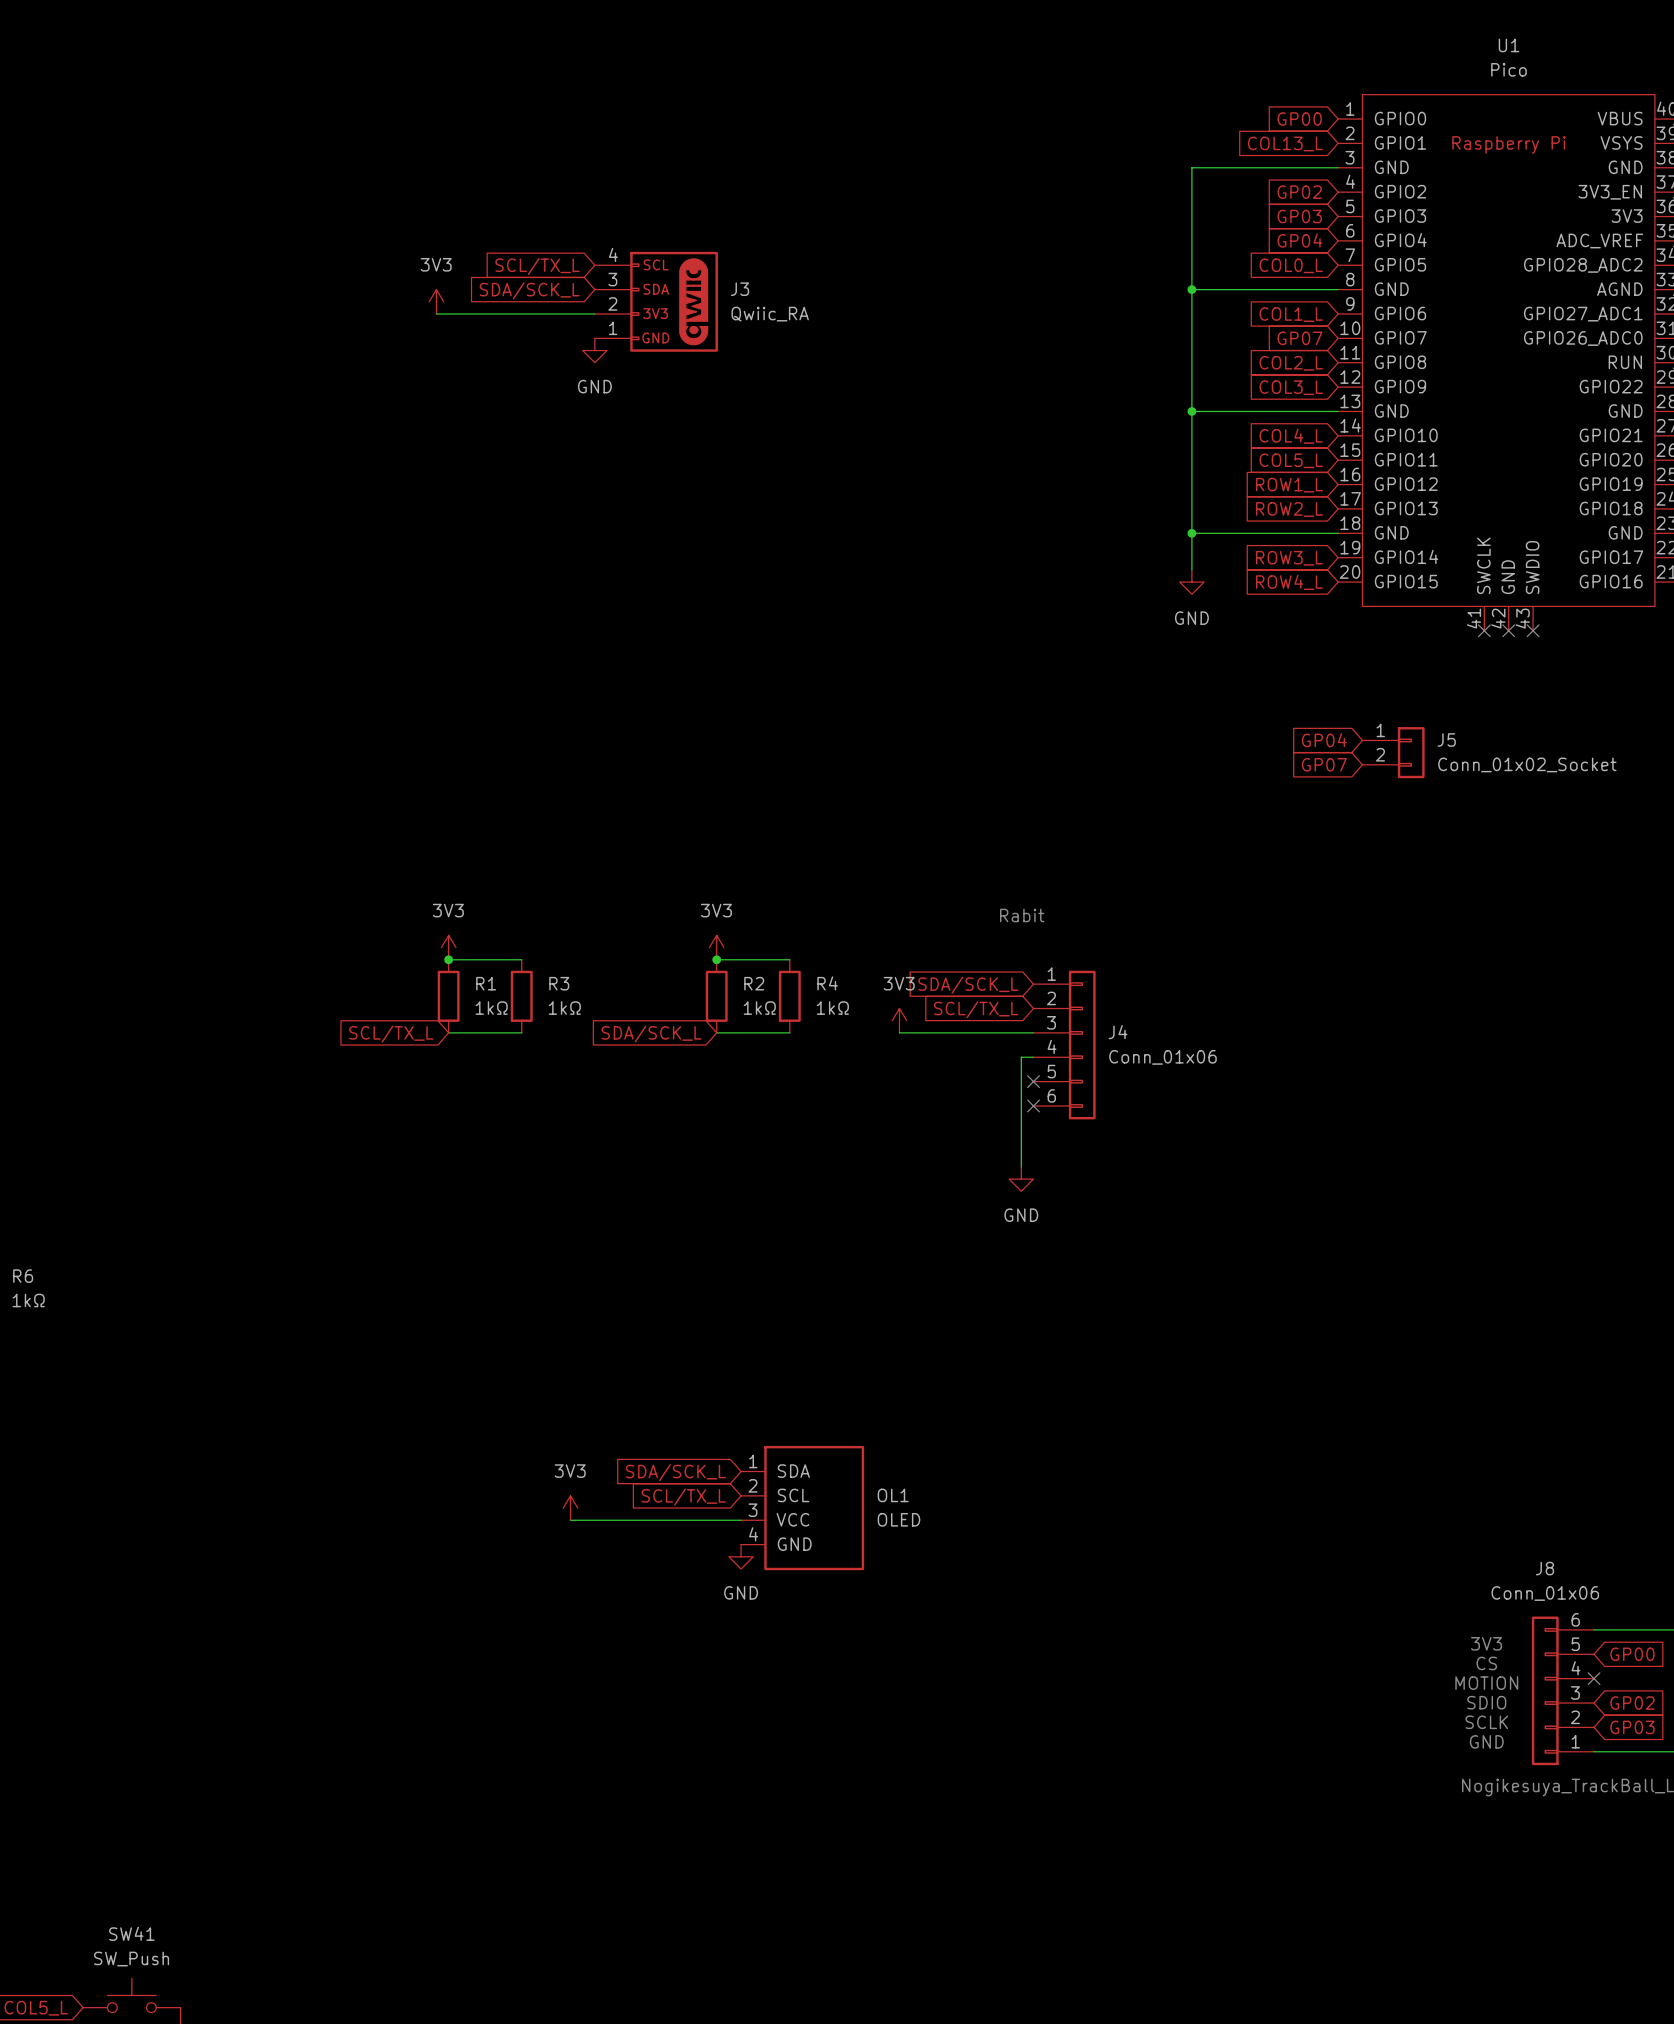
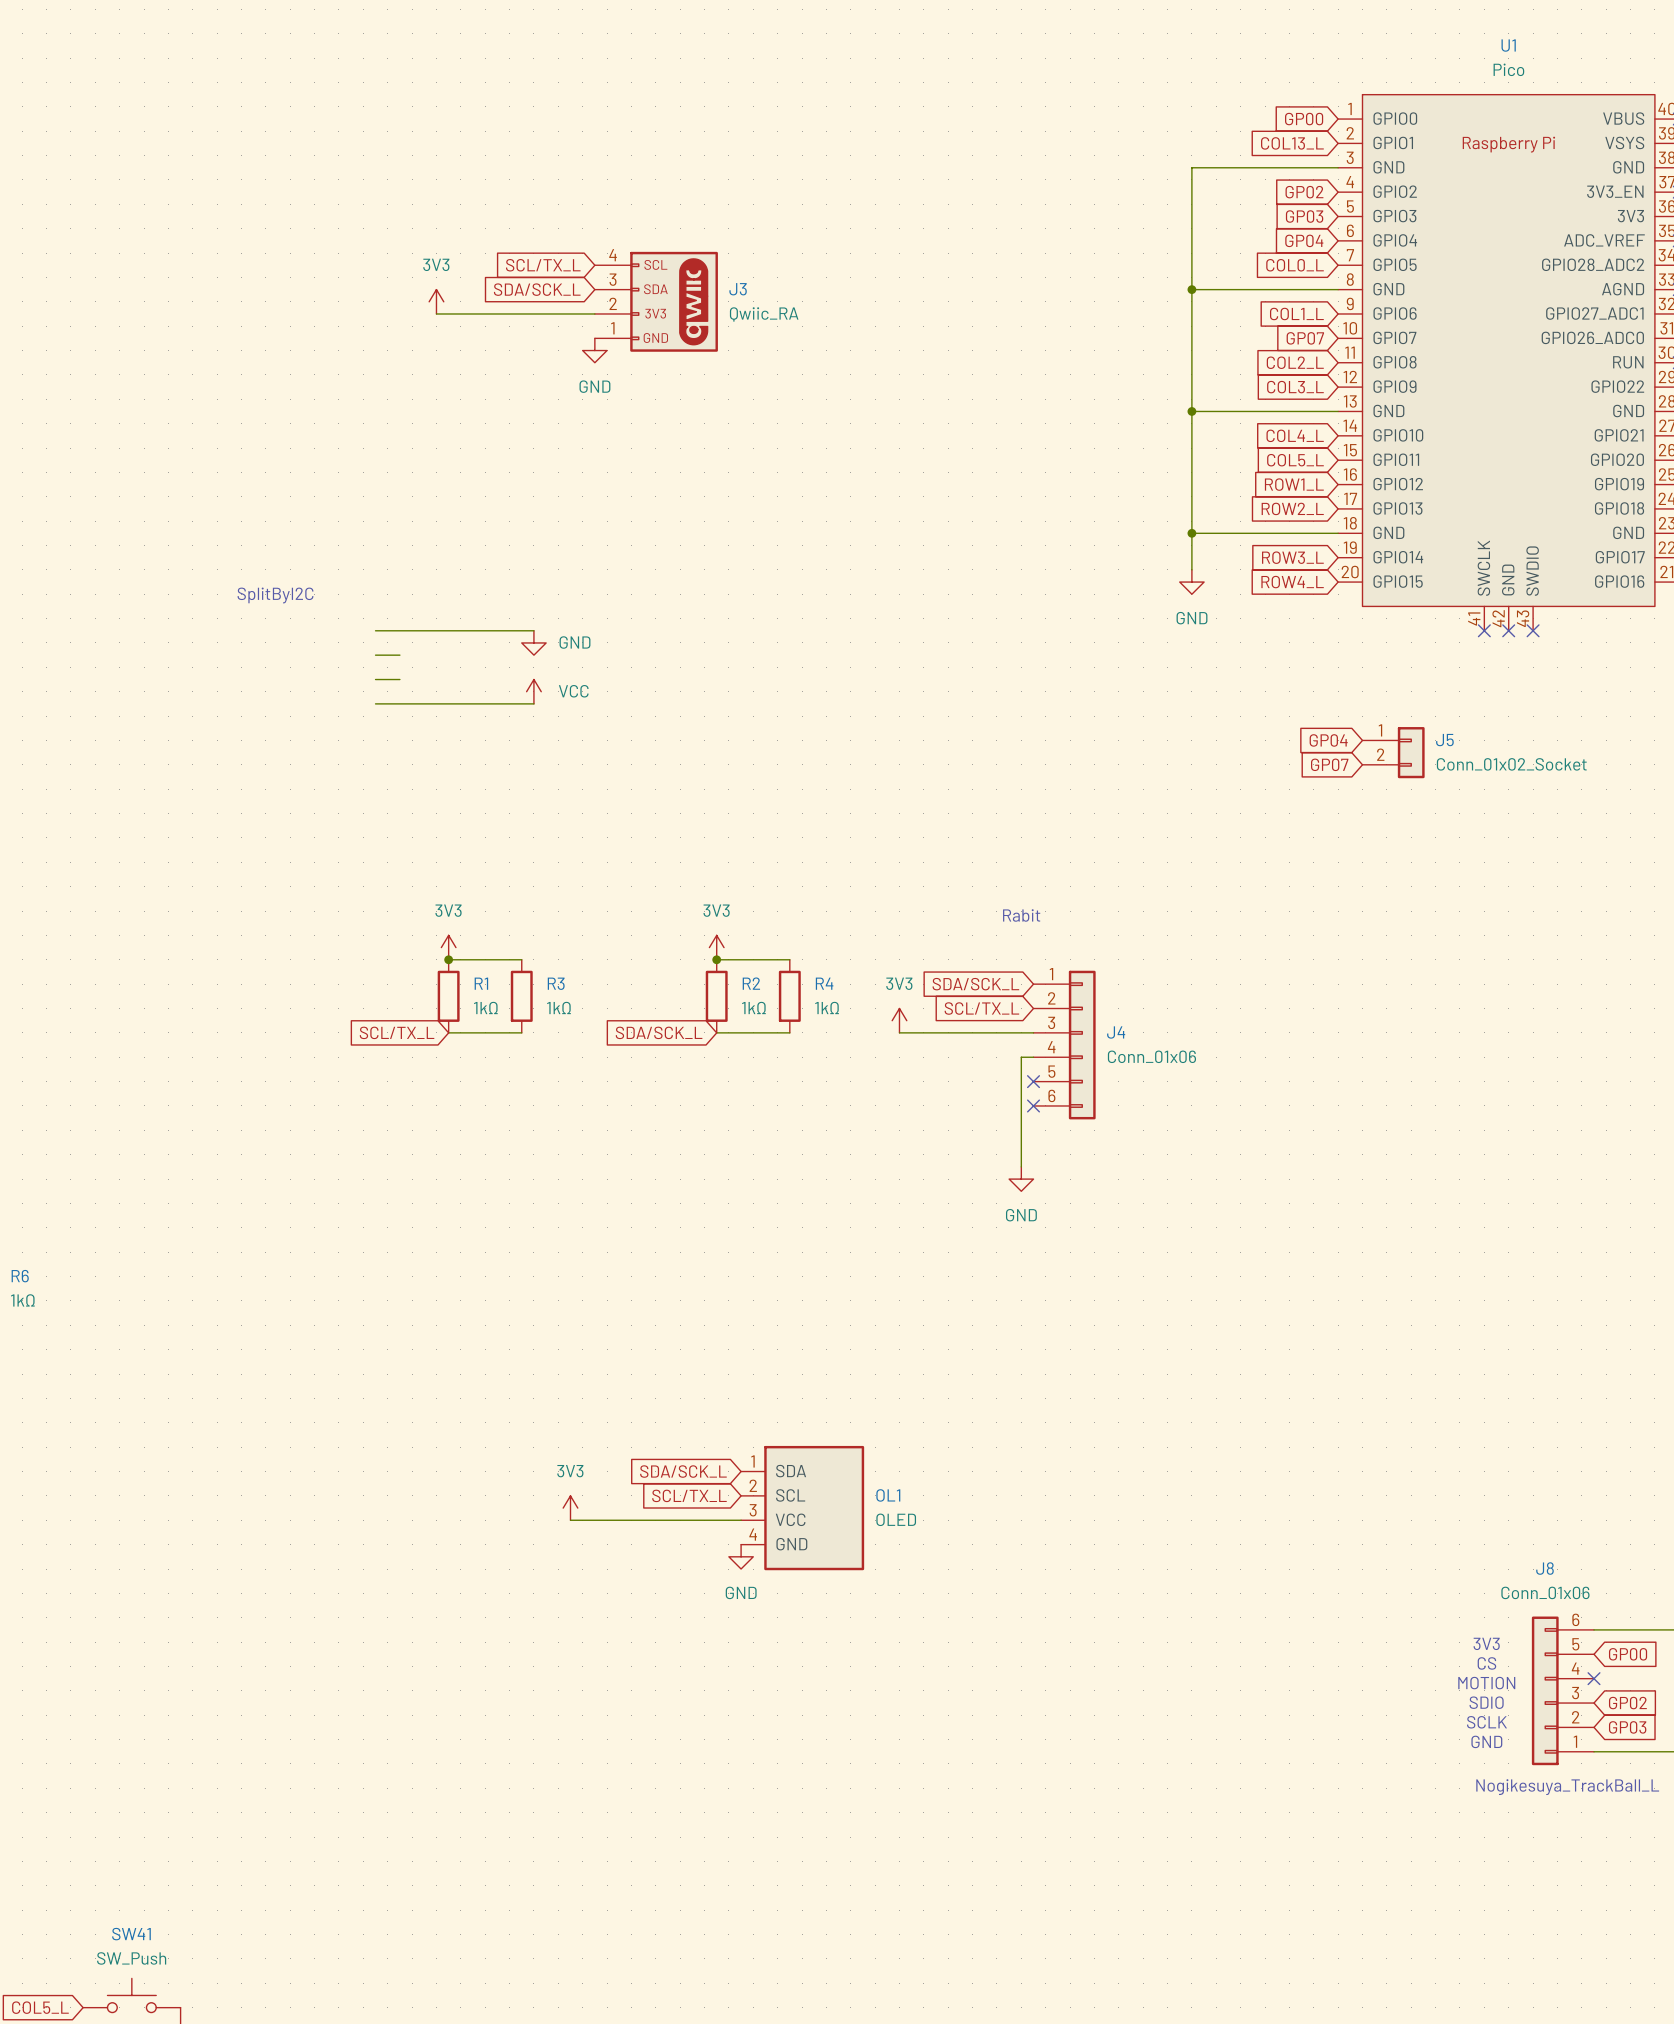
text: none -> SplitByI2C (275, 595)
wire: none -> (375, 630) (533, 630)
power symbol: none -> GND (533, 642)
wire: none -> (375, 655) (399, 655)
wire: none -> (375, 679) (399, 679)
power symbol: none -> VCC (533, 691)
wire: none -> (375, 703) (533, 703)

